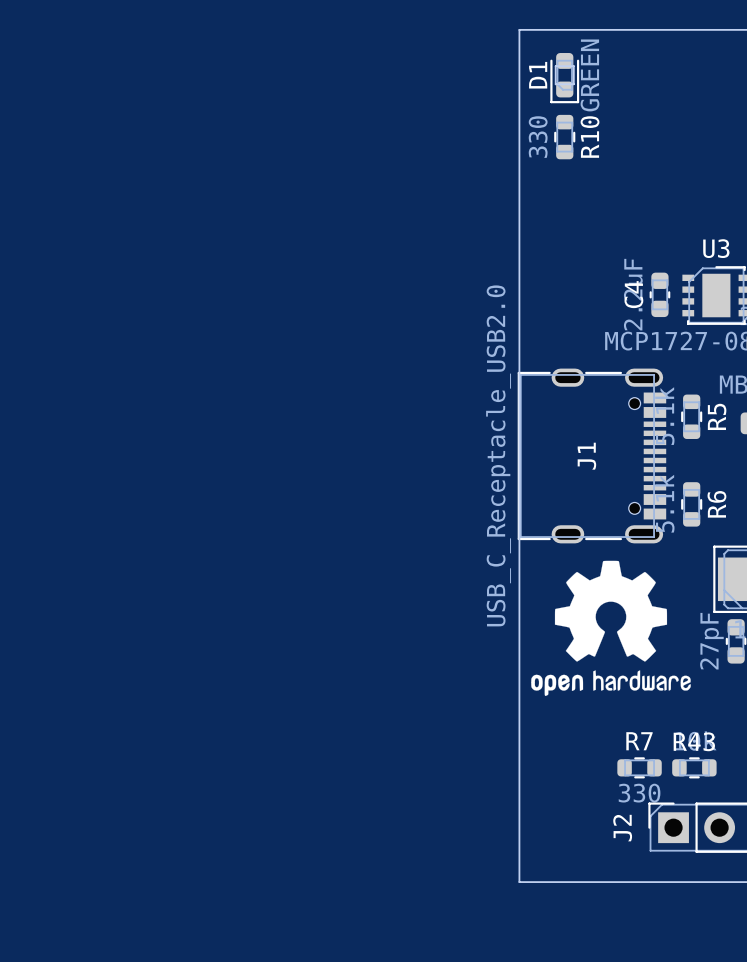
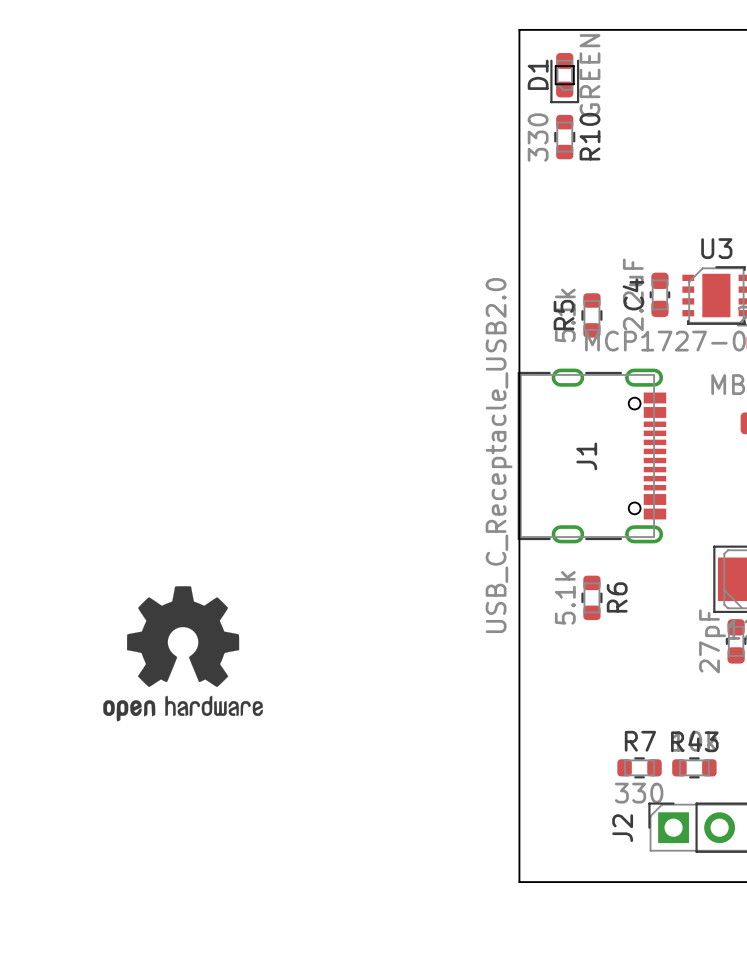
R5 position: (691, 416) -> (591, 315)
R5 name position: R5 (717, 416) -> R5 (564, 315)
R6 position: (691, 504) -> (591, 597)
drawing position: (610, 628) -> (183, 653)

